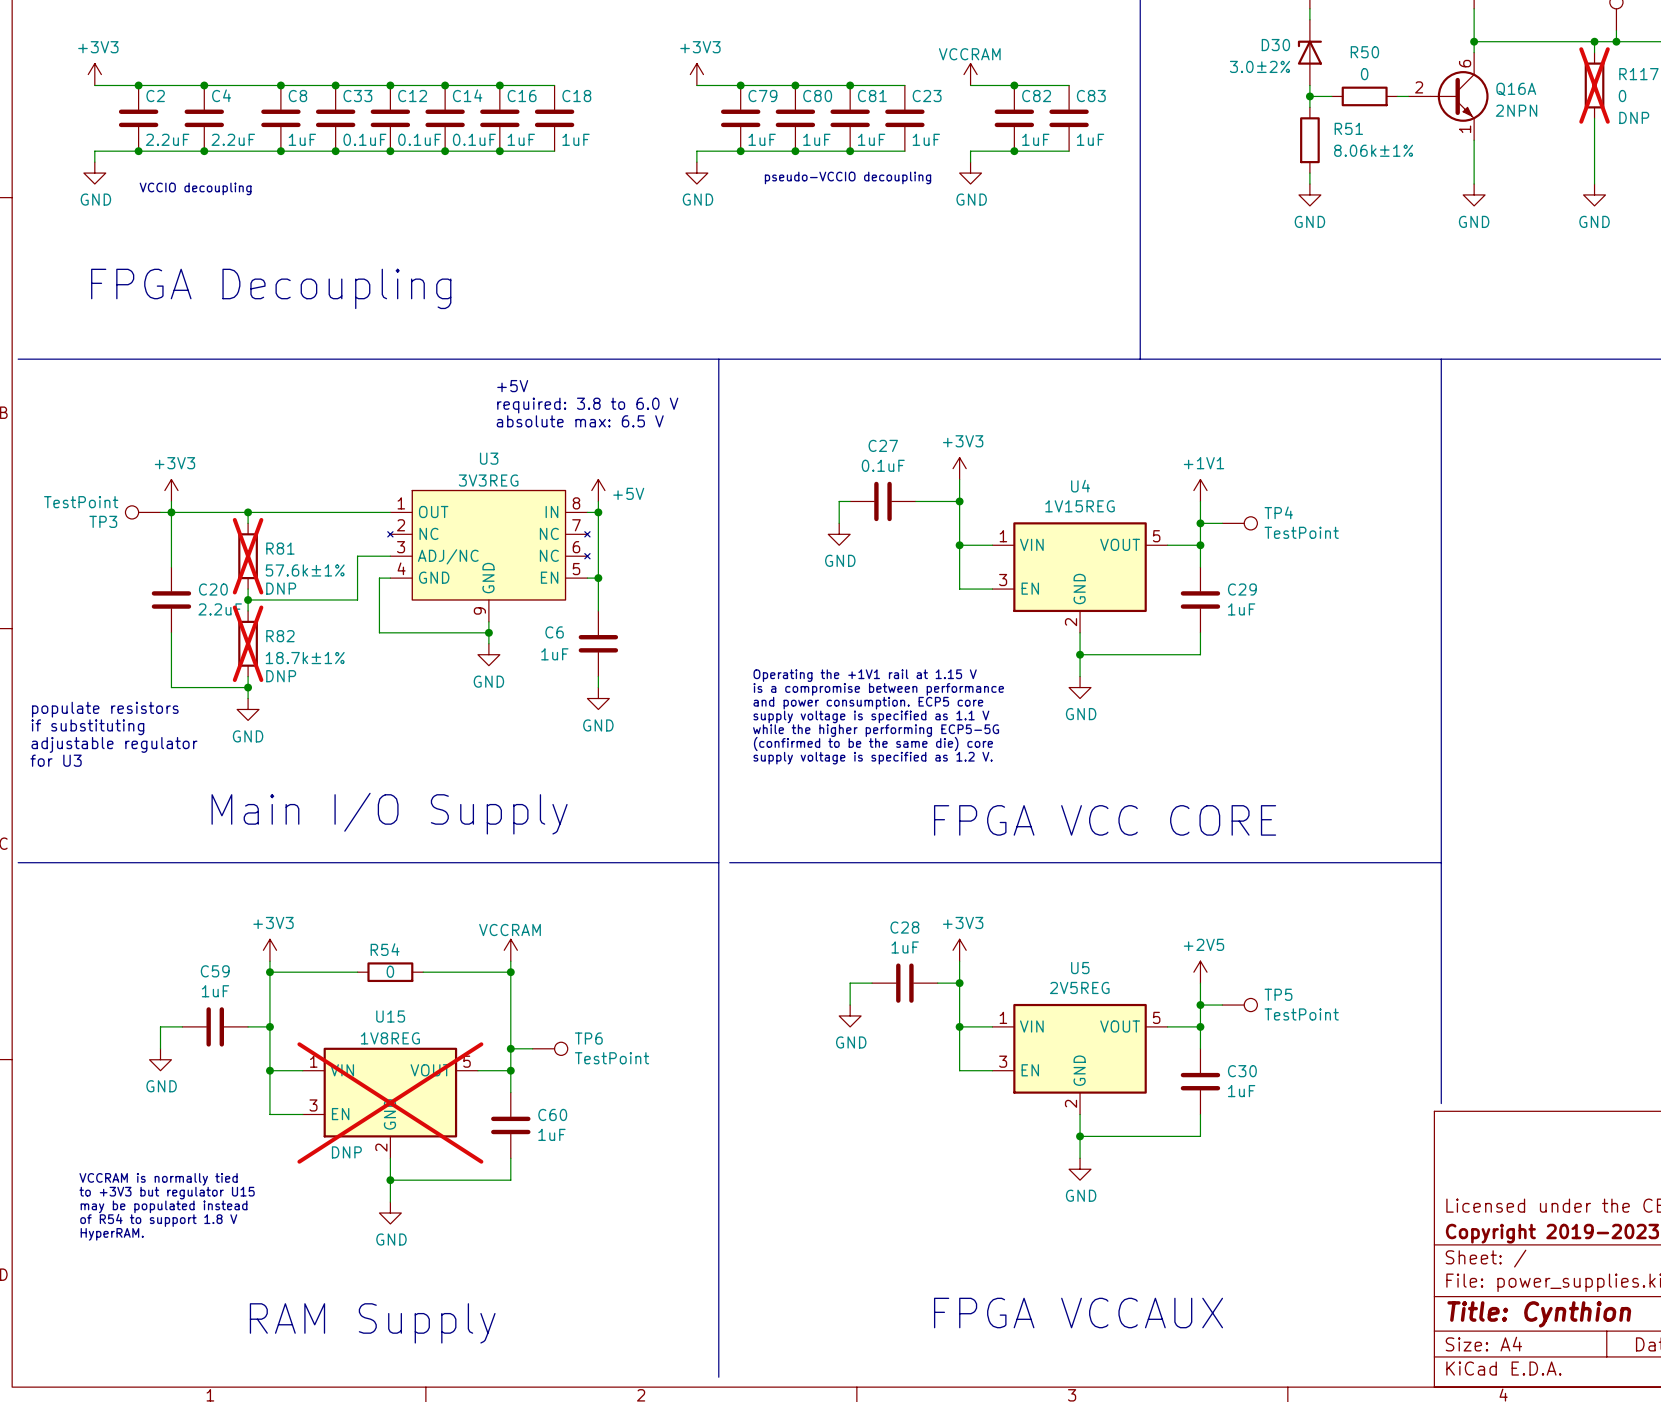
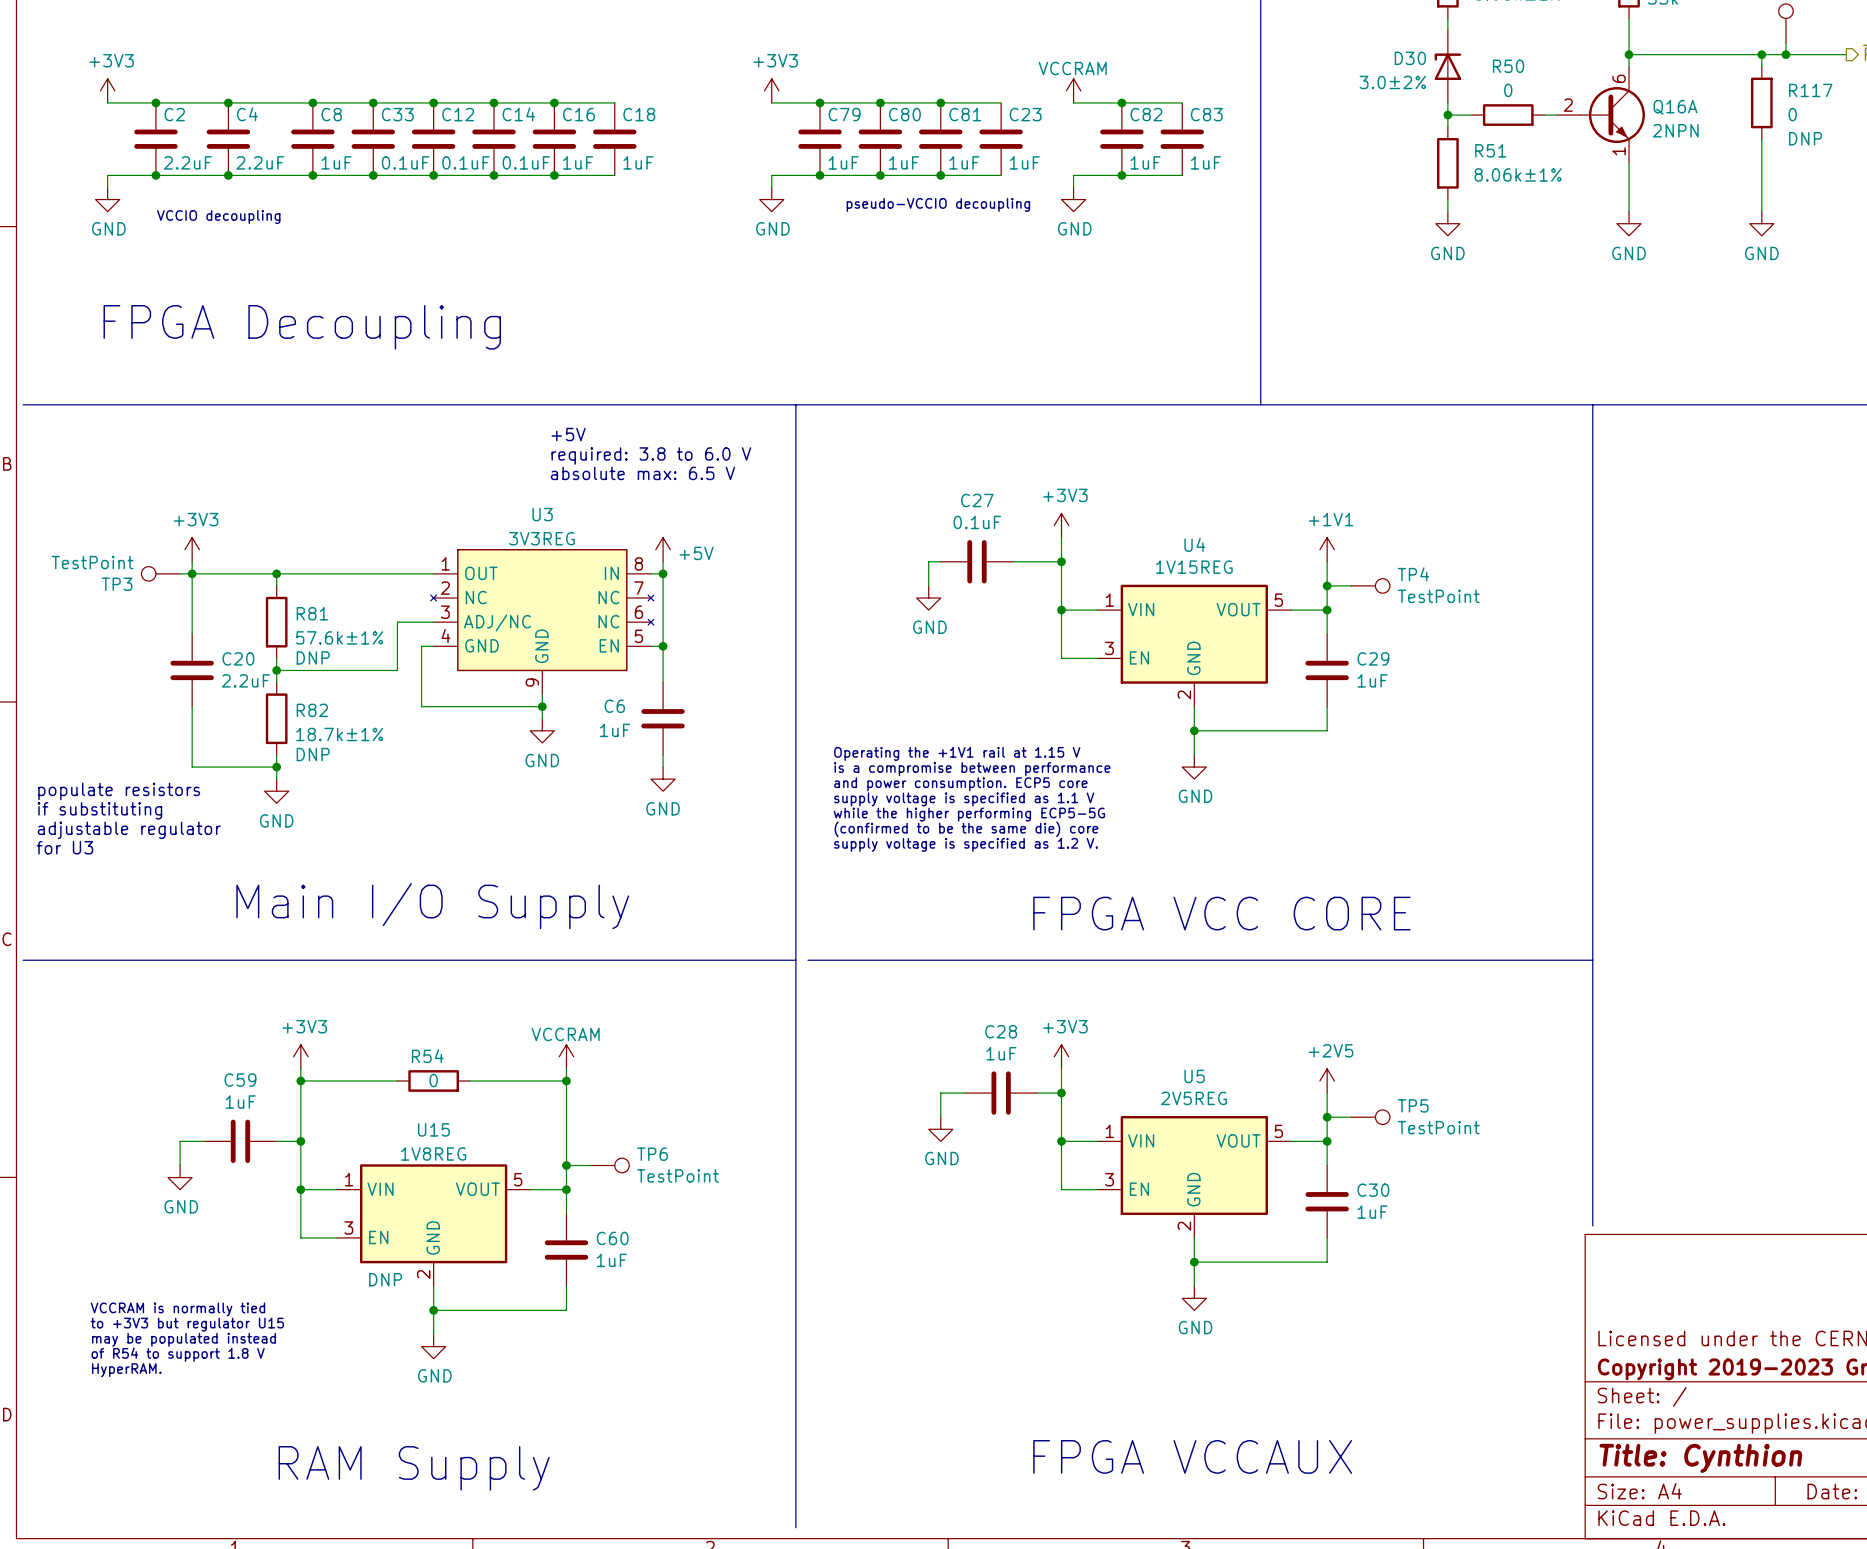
R117 do-not-place cross: (1594, 85) -> none
R81 do-not-place cross: (248, 556) -> none
R82 do-not-place cross: (248, 643) -> none
U15 do-not-place cross: (390, 1103) -> none

